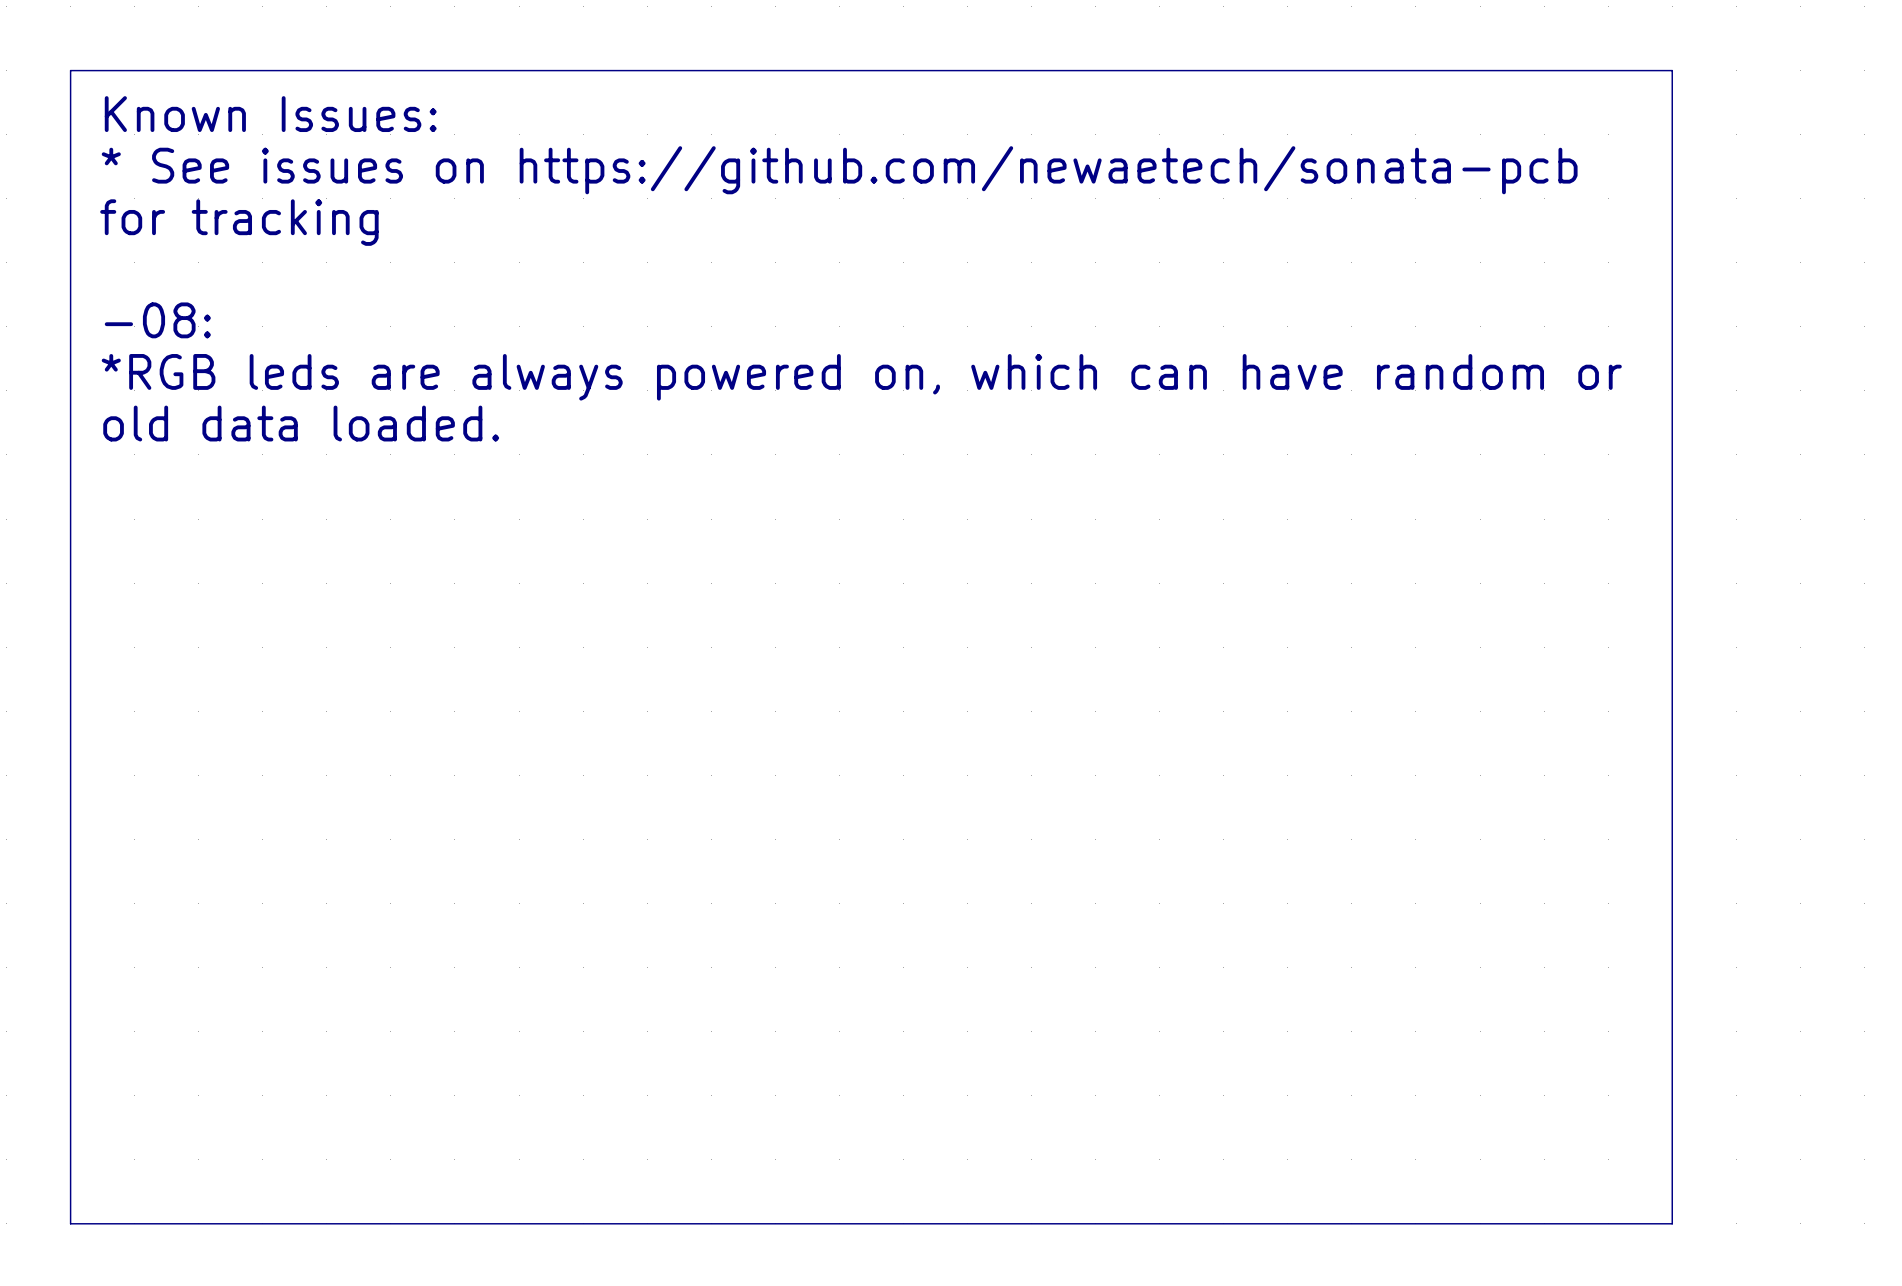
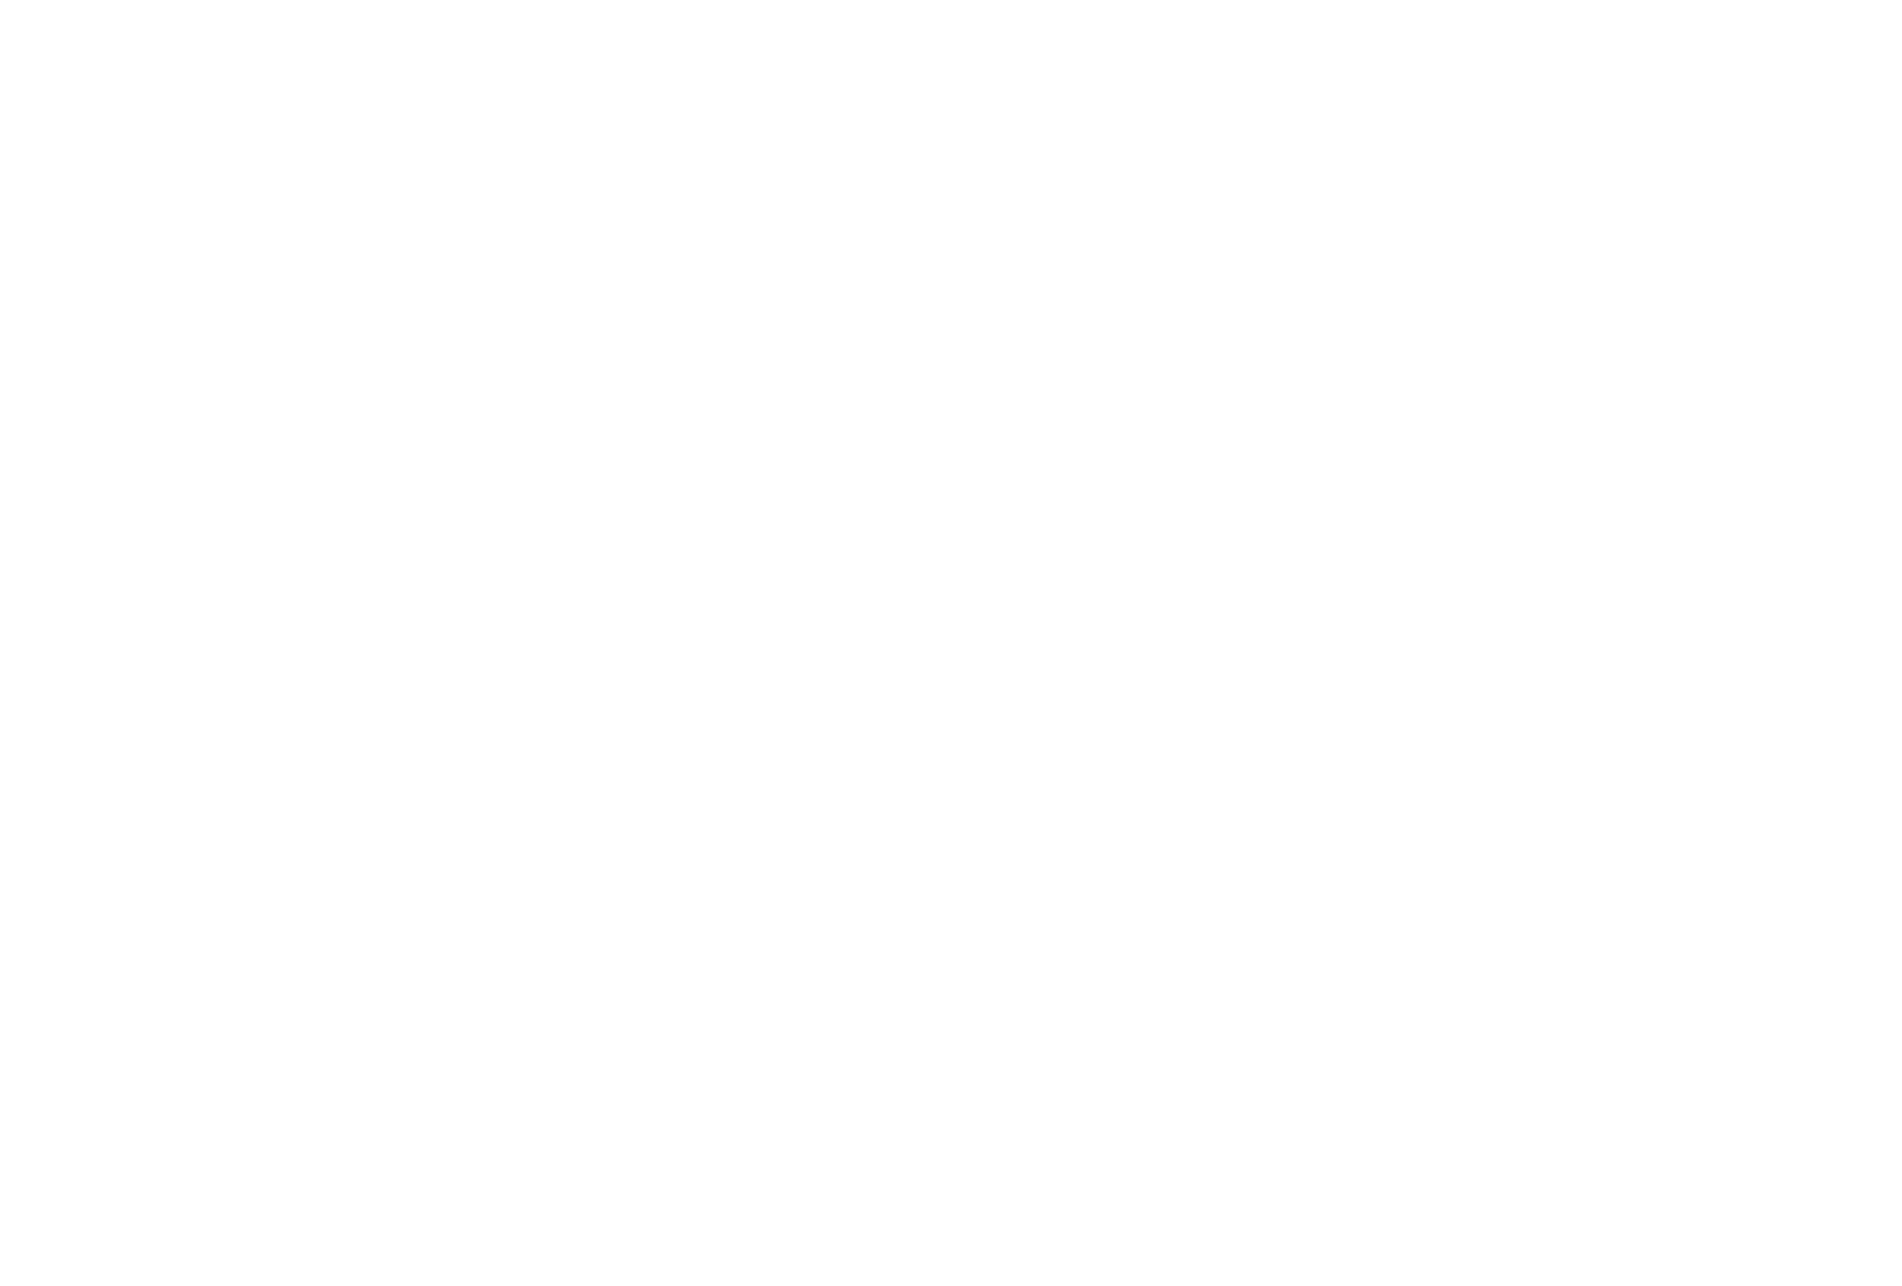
line: (70, 70) (1672, 70) (1672, 1223) (70, 1223) (70, 70) -> none
text: Known Issues: (270, 114) -> none
text: * See issues on https://github.com/newaetech/sonata-pcb (839, 170) -> none
text: for tracking (239, 222) -> none
text: -08: (157, 320) -> none
text: *RGB leds are always powered on, which can have random or (861, 377) -> none
text: old data loaded. (301, 423) -> none

